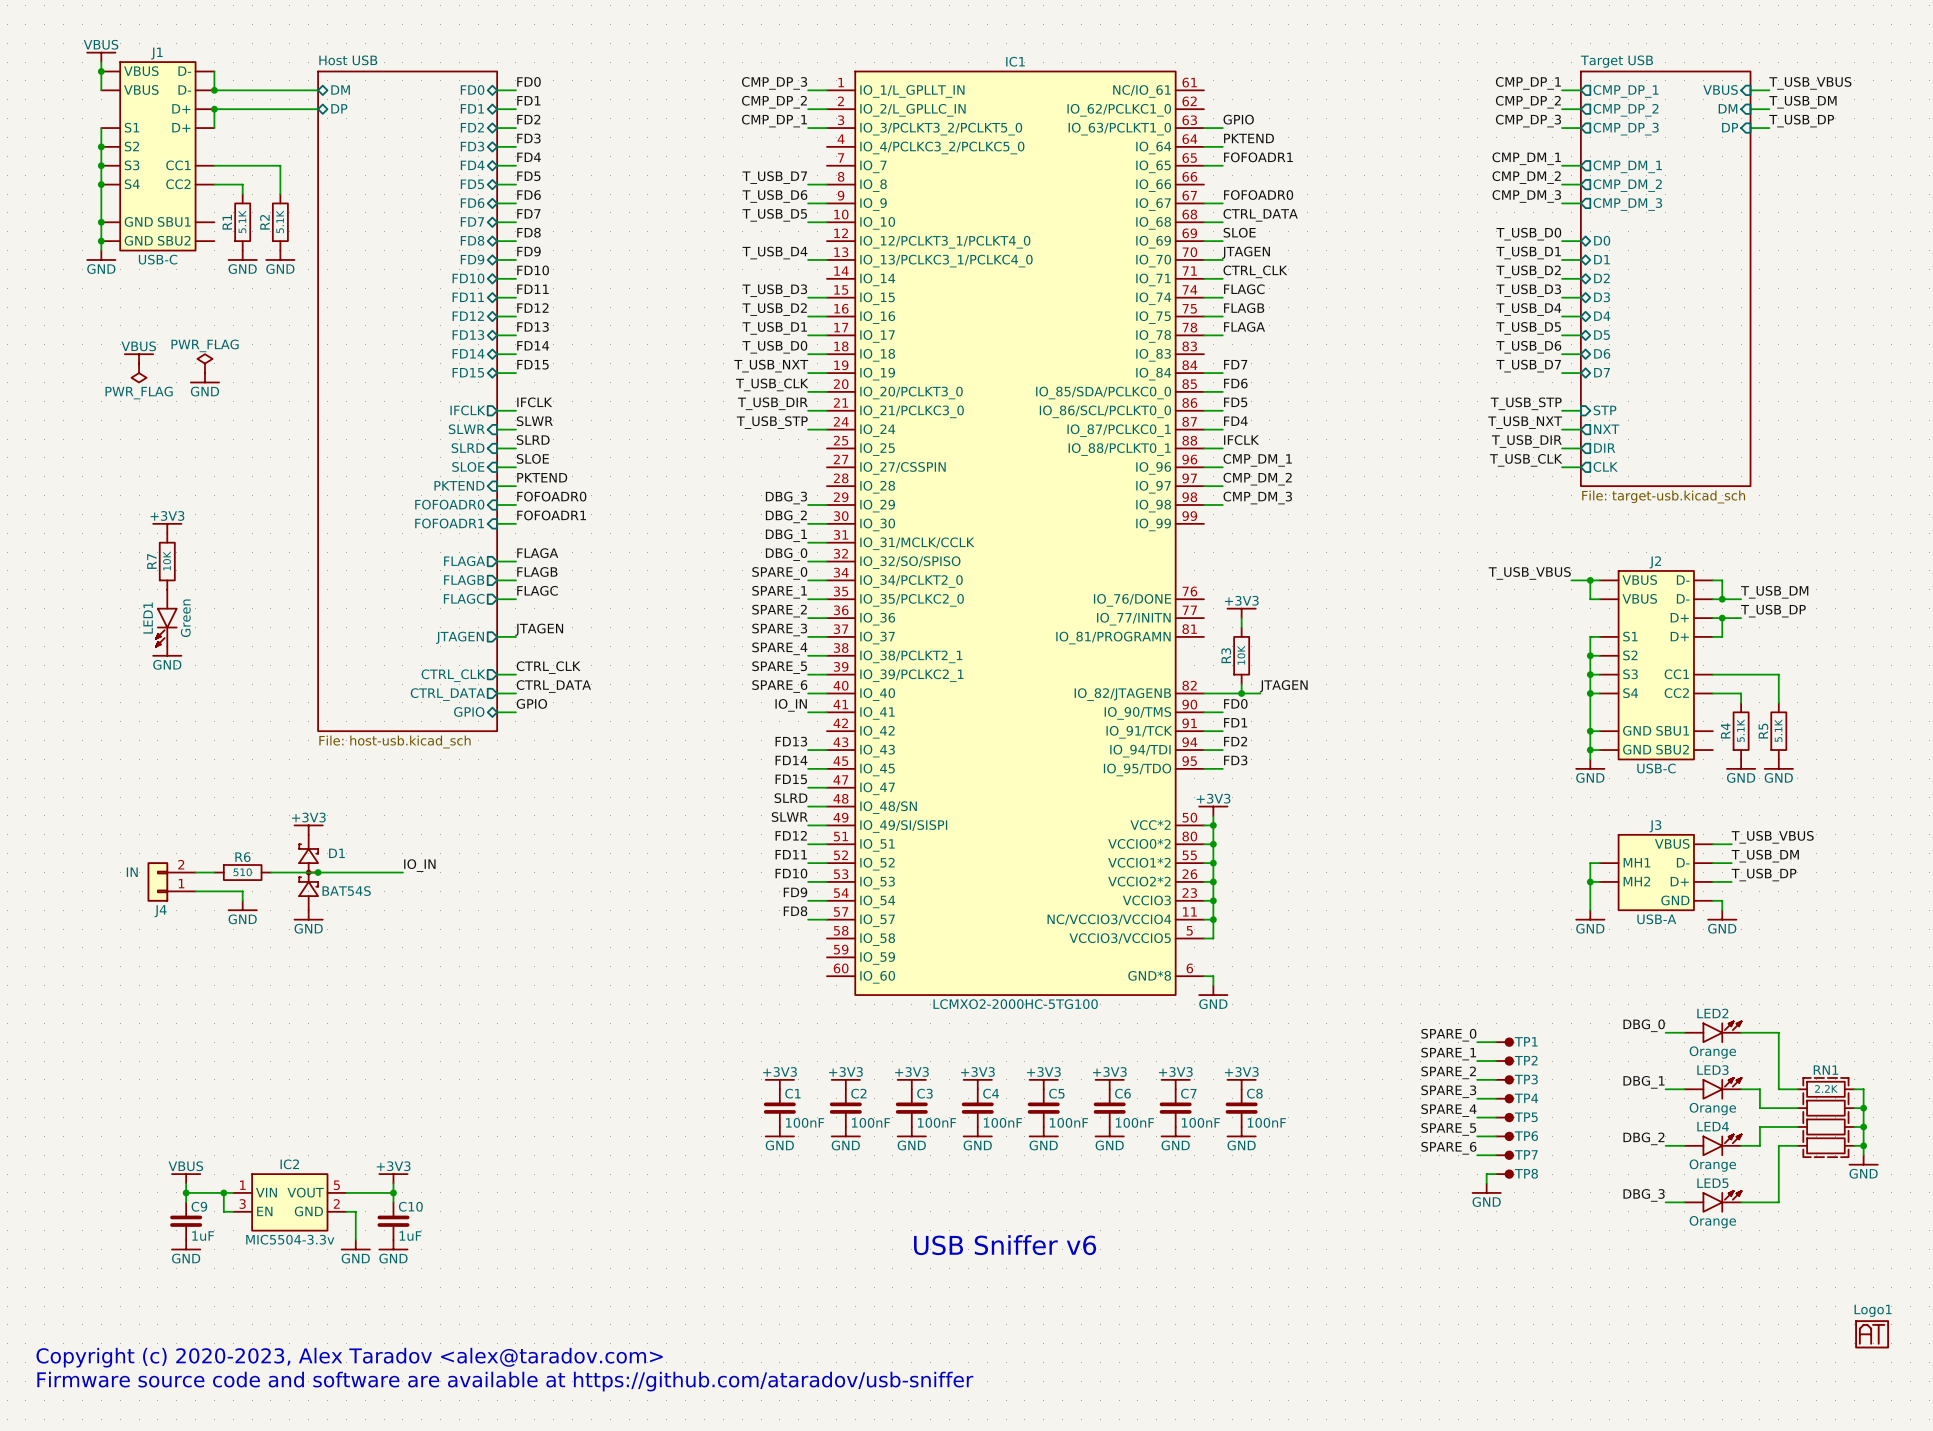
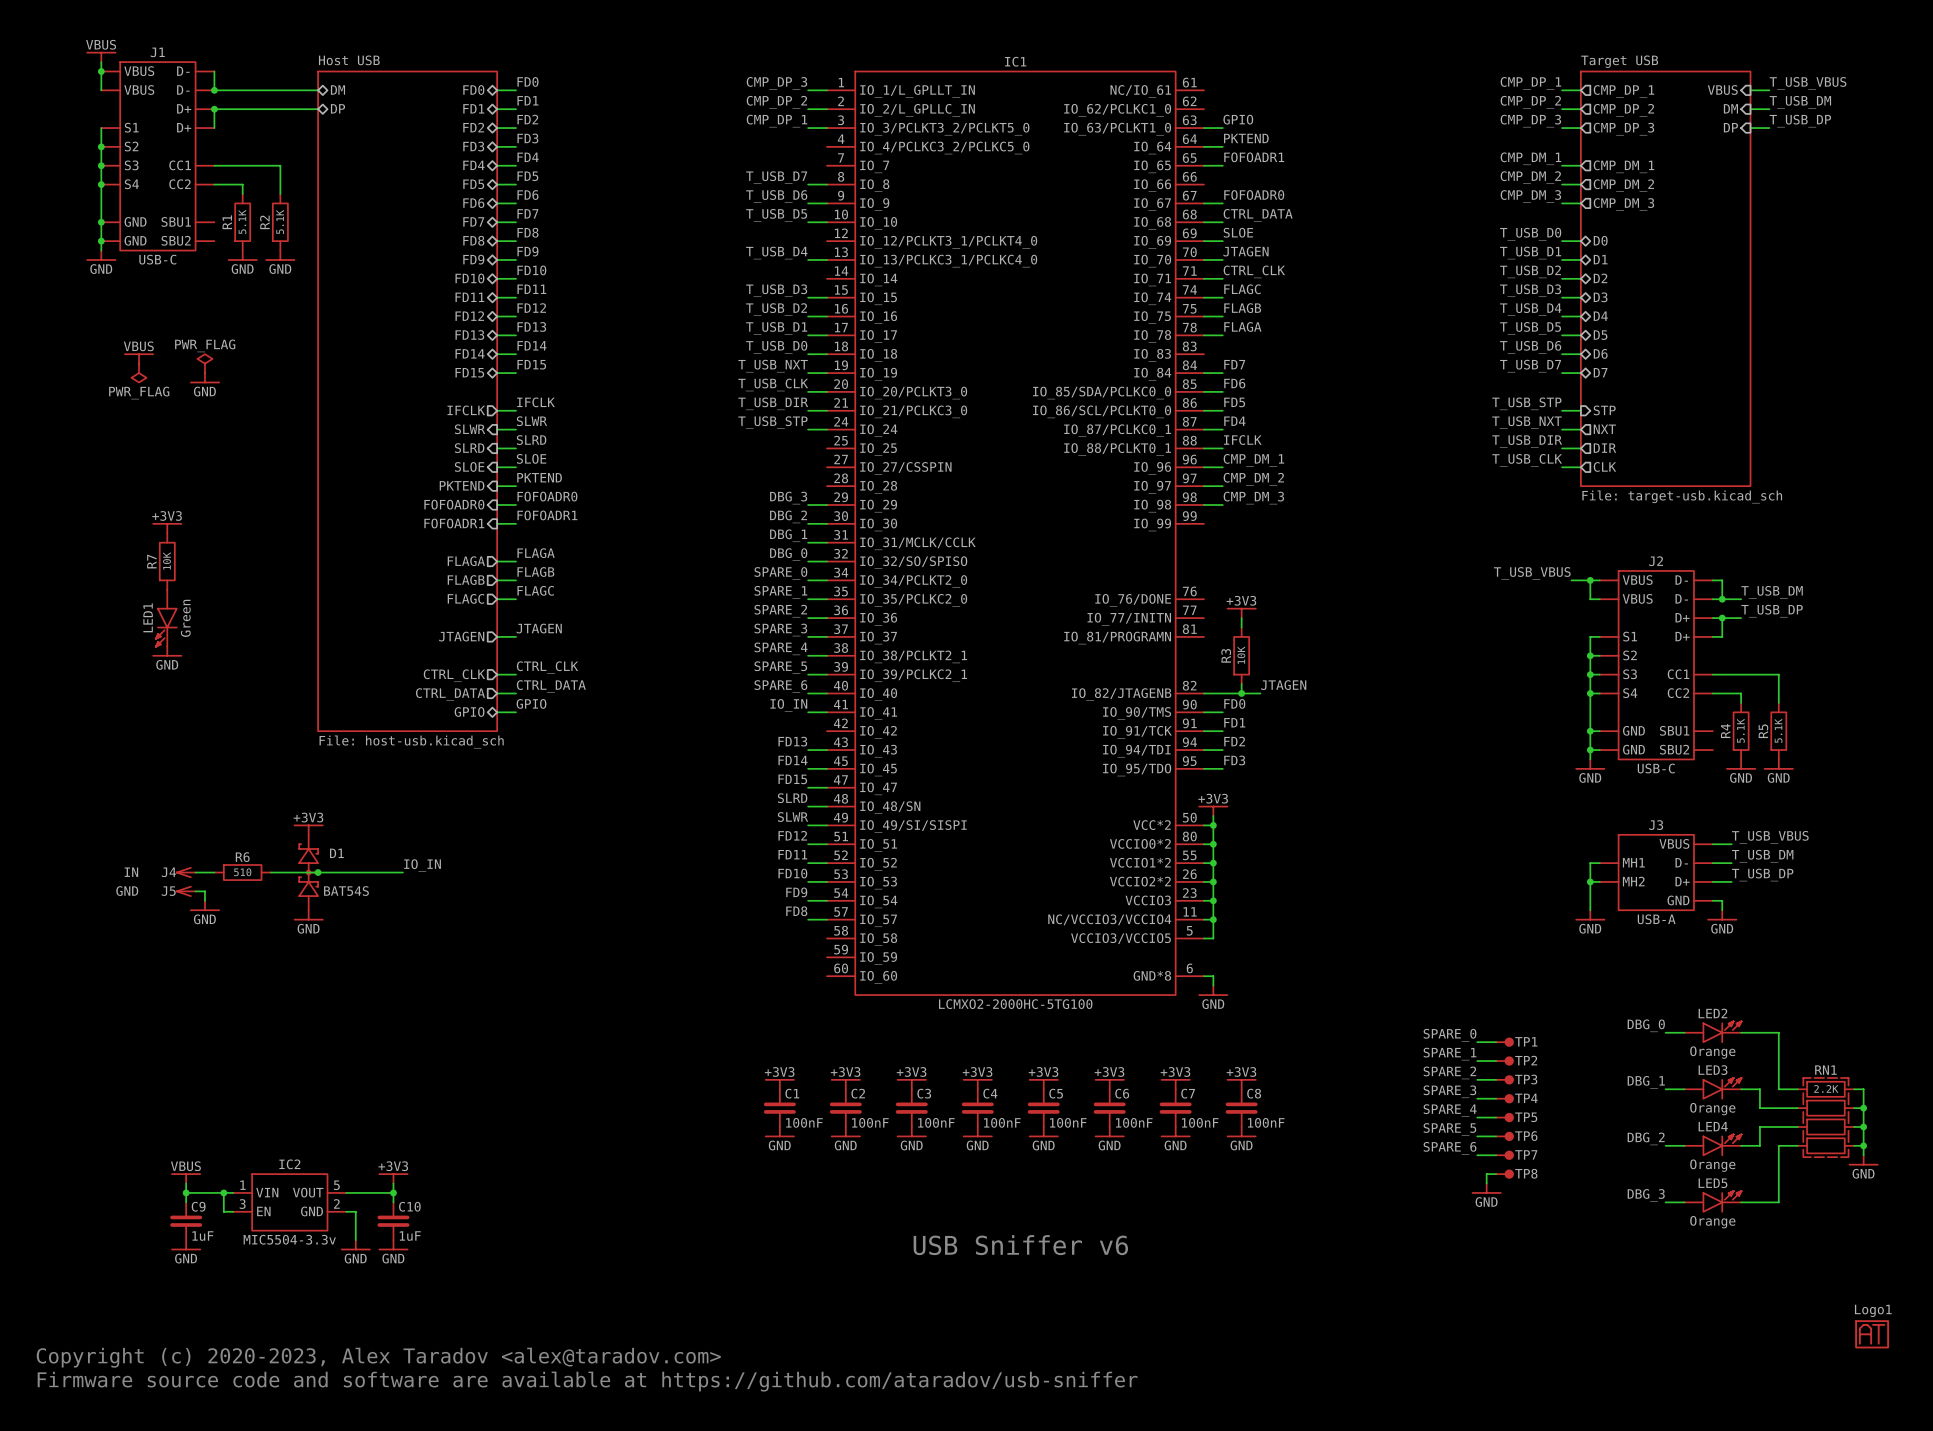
J4 symbol: [147, 862, 196, 902] -> [176, 867, 196, 878]
J5: none -> GND (186, 891)
wire: (204, 891) (242, 891) (242, 900) -> (204, 891) (204, 900)
power symbol position: GND (242, 905) -> GND (204, 905)
J4 name position: J4 (160, 911) -> J4 (168, 872)

